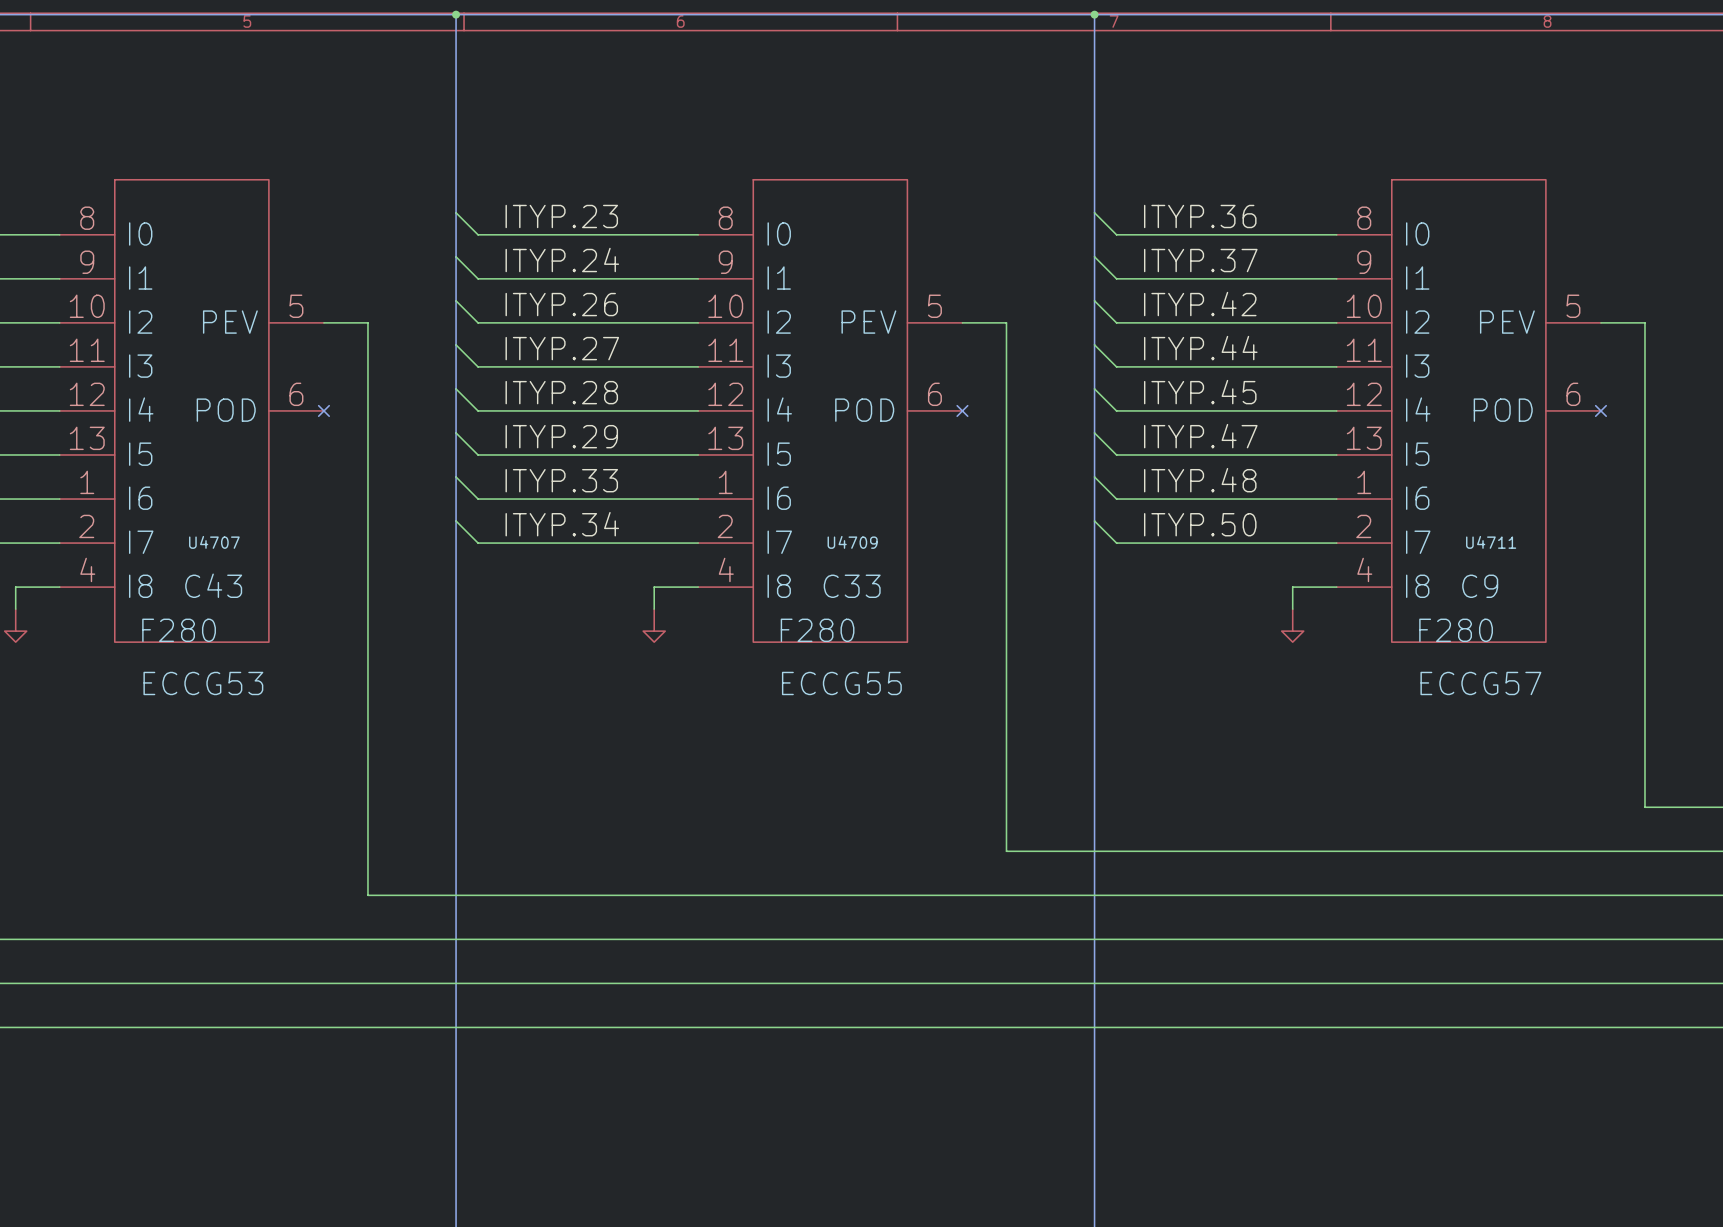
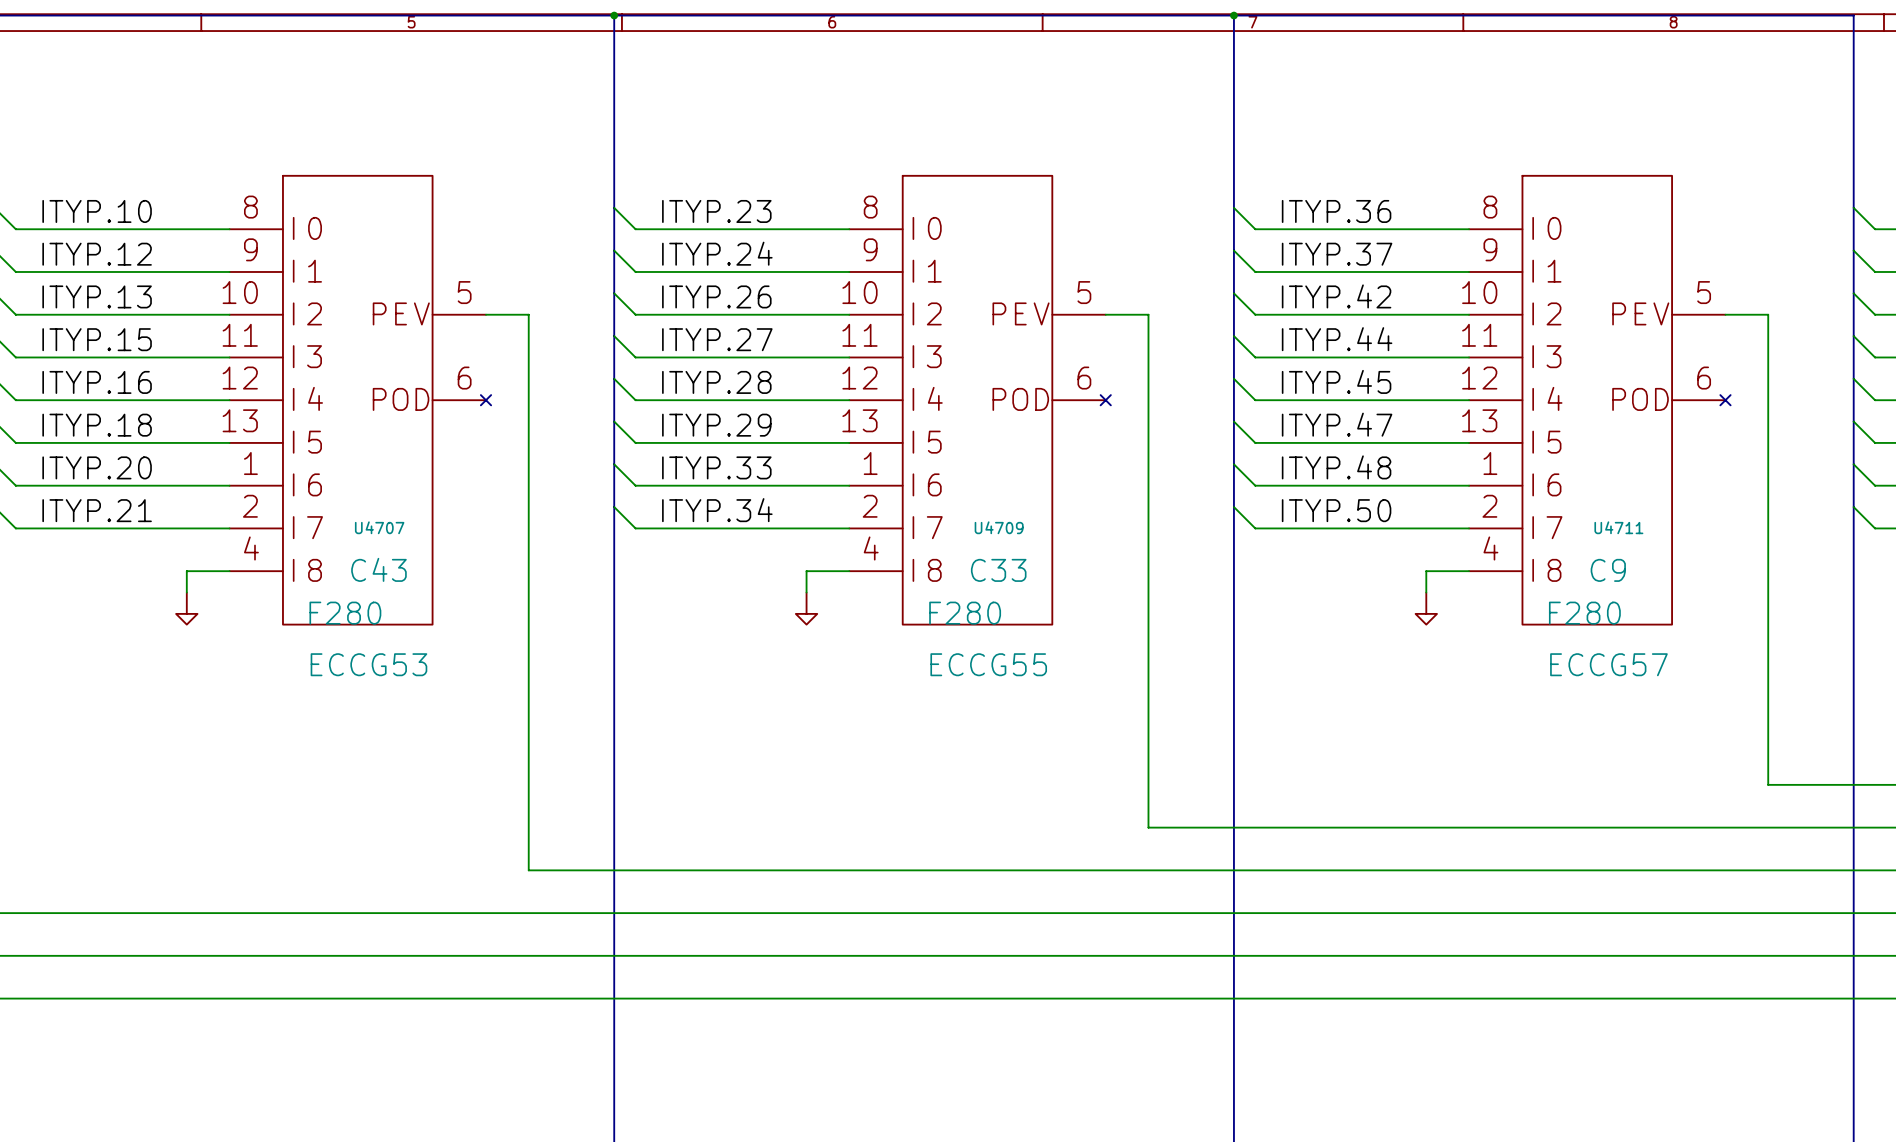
U4707 symbol: [59, 179, 324, 643] -> [229, 175, 487, 625]
U4709 symbol: [698, 179, 963, 643] -> [849, 175, 1106, 625]
U4711 symbol: [1336, 179, 1601, 643] -> [1469, 175, 1726, 625]

